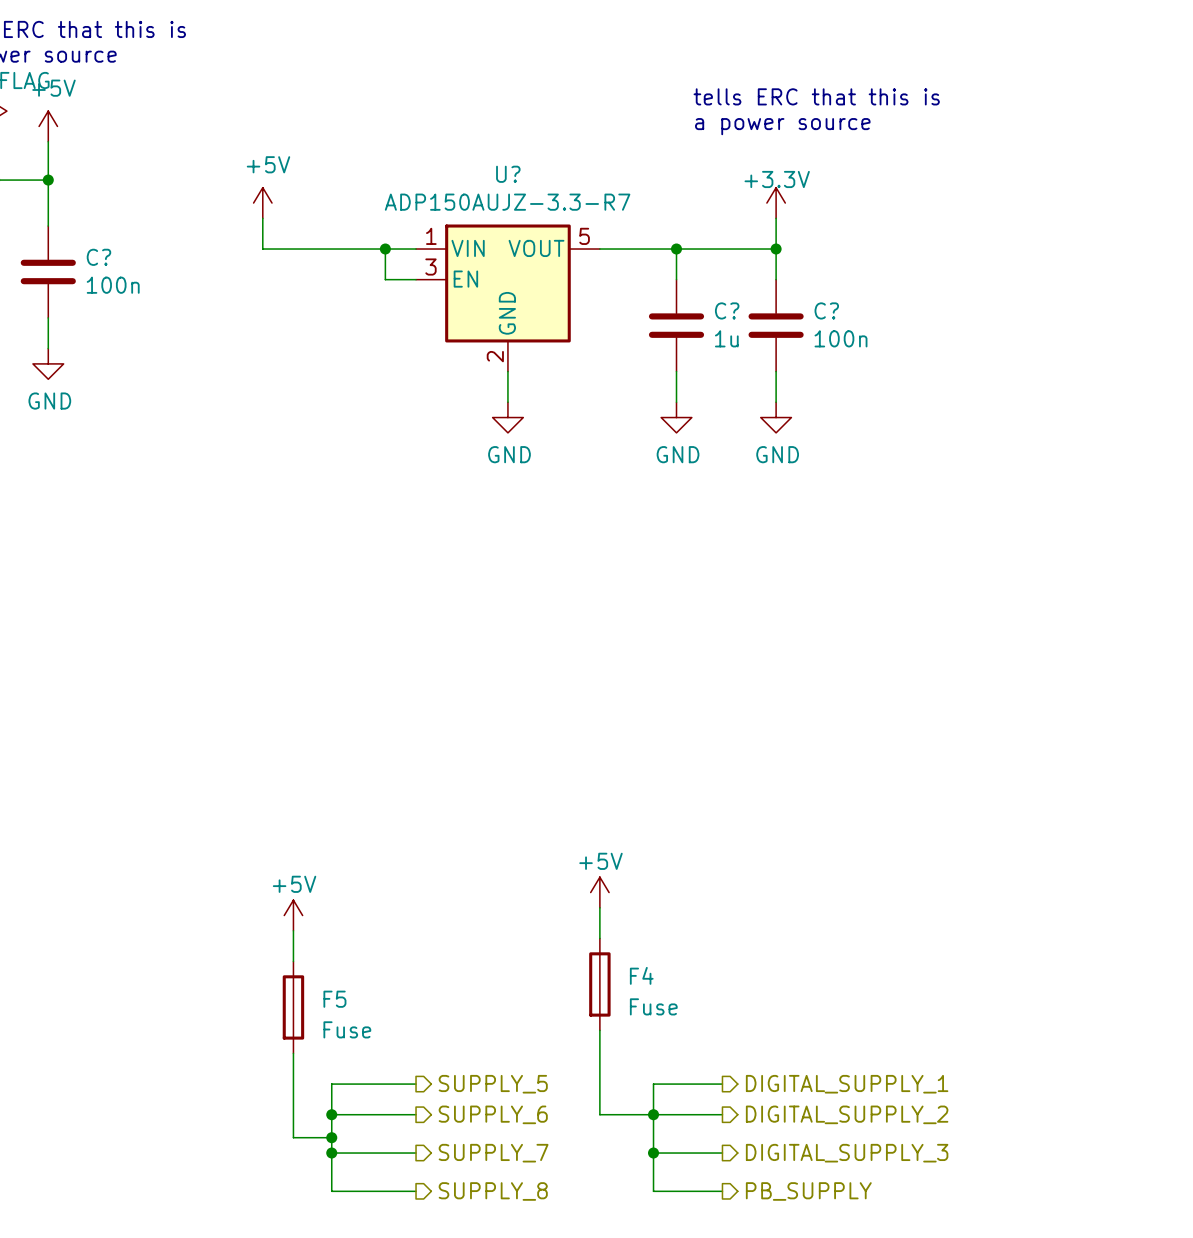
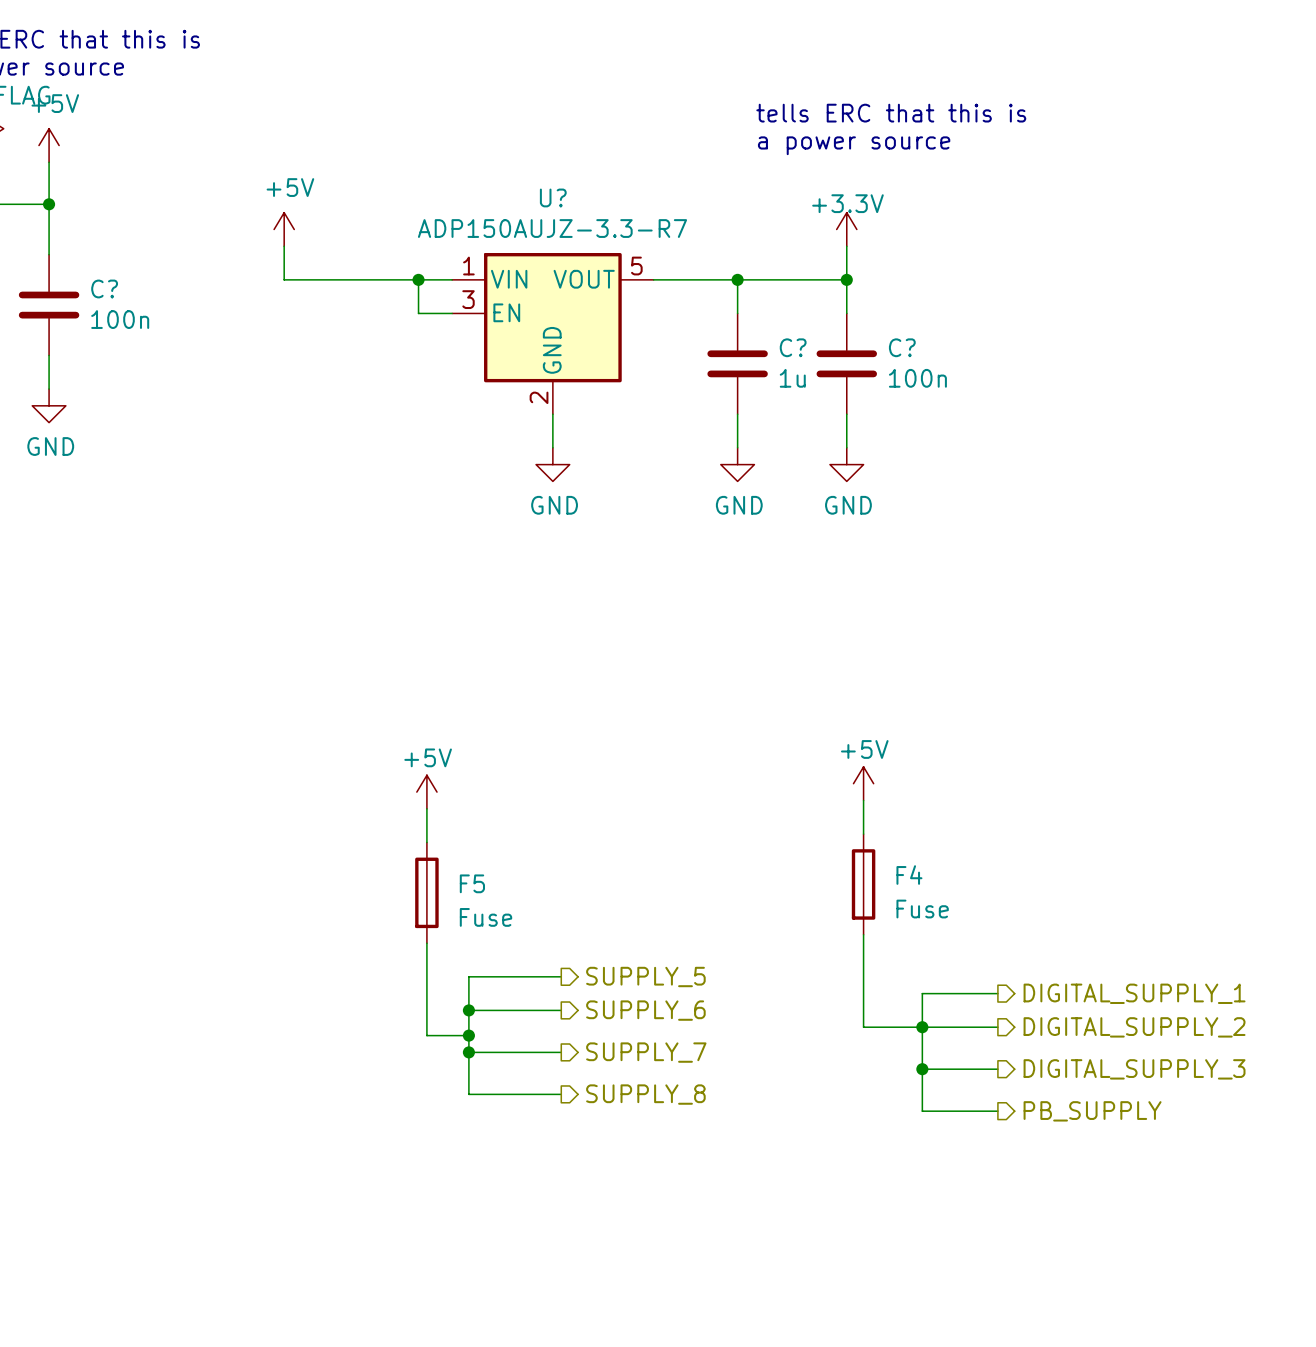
power symbol: none -> +5V (863, 783)
power symbol: none -> +5V (426, 792)
power symbol: +5V (599, 892) -> none
wire: (599, 907) (599, 938) -> (863, 800) (863, 834)
power symbol: +5V (293, 915) -> none
junction: none -> (468, 1010)
wire: (293, 930) (293, 961) -> (426, 808) (426, 842)
junction: none -> (922, 1027)
junction: none -> (468, 1035)
junction: none -> (468, 1052)
junction: none -> (922, 1069)
F4 position: (599, 984) -> (863, 884)
F5 position: (293, 1007) -> (426, 892)
wire: (599, 1030) (599, 1114) (722, 1114) -> (863, 934) (863, 1027) (997, 1027)
wire: (293, 1053) (293, 1137) (331, 1137) -> (426, 943) (426, 1035) (468, 1035)
wire: (416, 1084) (331, 1084) (331, 1191) (416, 1191) -> (561, 976) (468, 976) (468, 1094) (561, 1094)
hierarchical label position: SUPPLY_5 (493, 1084) -> SUPPLY_5 (645, 976)
wire: (722, 1084) (653, 1084) (653, 1191) (722, 1191) -> (997, 993) (922, 993) (922, 1111) (997, 1111)
hierarchical label position: DIGITAL_SUPPLY_1 (847, 1084) -> DIGITAL_SUPPLY_1 (1134, 993)
wire: (331, 1114) (416, 1114) -> (468, 1010) (561, 1010)
junction: (331, 1114) -> none
hierarchical label position: SUPPLY_6 (493, 1114) -> SUPPLY_6 (645, 1010)
junction: (653, 1114) -> none
hierarchical label position: DIGITAL_SUPPLY_2 (847, 1114) -> DIGITAL_SUPPLY_2 (1134, 1027)
junction: (331, 1137) -> none
wire: (331, 1153) (416, 1153) -> (468, 1052) (561, 1052)
junction: (331, 1153) -> none
hierarchical label position: SUPPLY_7 (493, 1153) -> SUPPLY_7 (646, 1052)
wire: (653, 1153) (722, 1153) -> (922, 1069) (997, 1069)
junction: (653, 1153) -> none
hierarchical label position: DIGITAL_SUPPLY_3 (847, 1153) -> DIGITAL_SUPPLY_3 (1134, 1069)
hierarchical label position: SUPPLY_8 (493, 1191) -> SUPPLY_8 (645, 1094)
hierarchical label position: PB_SUPPLY (808, 1191) -> PB_SUPPLY (1092, 1111)

